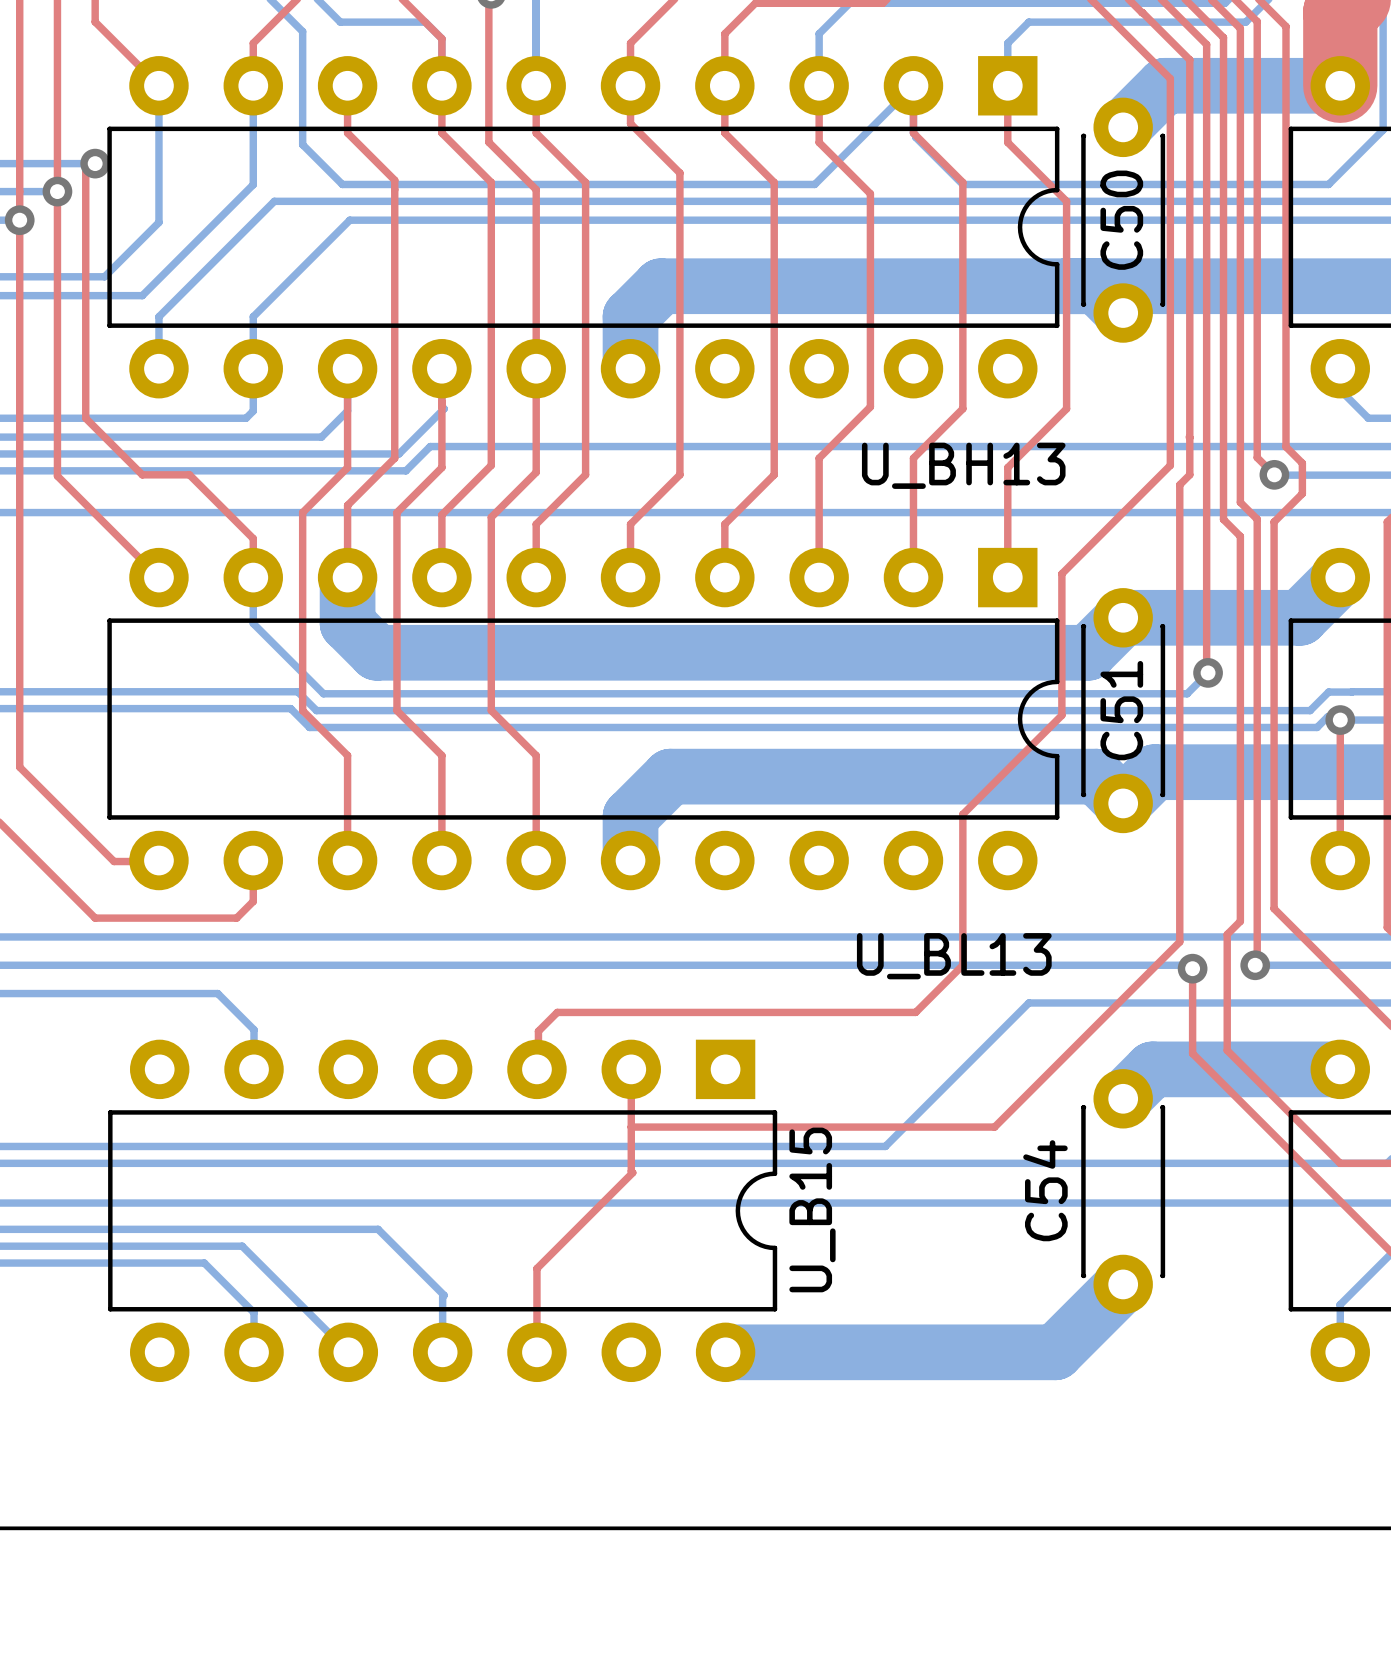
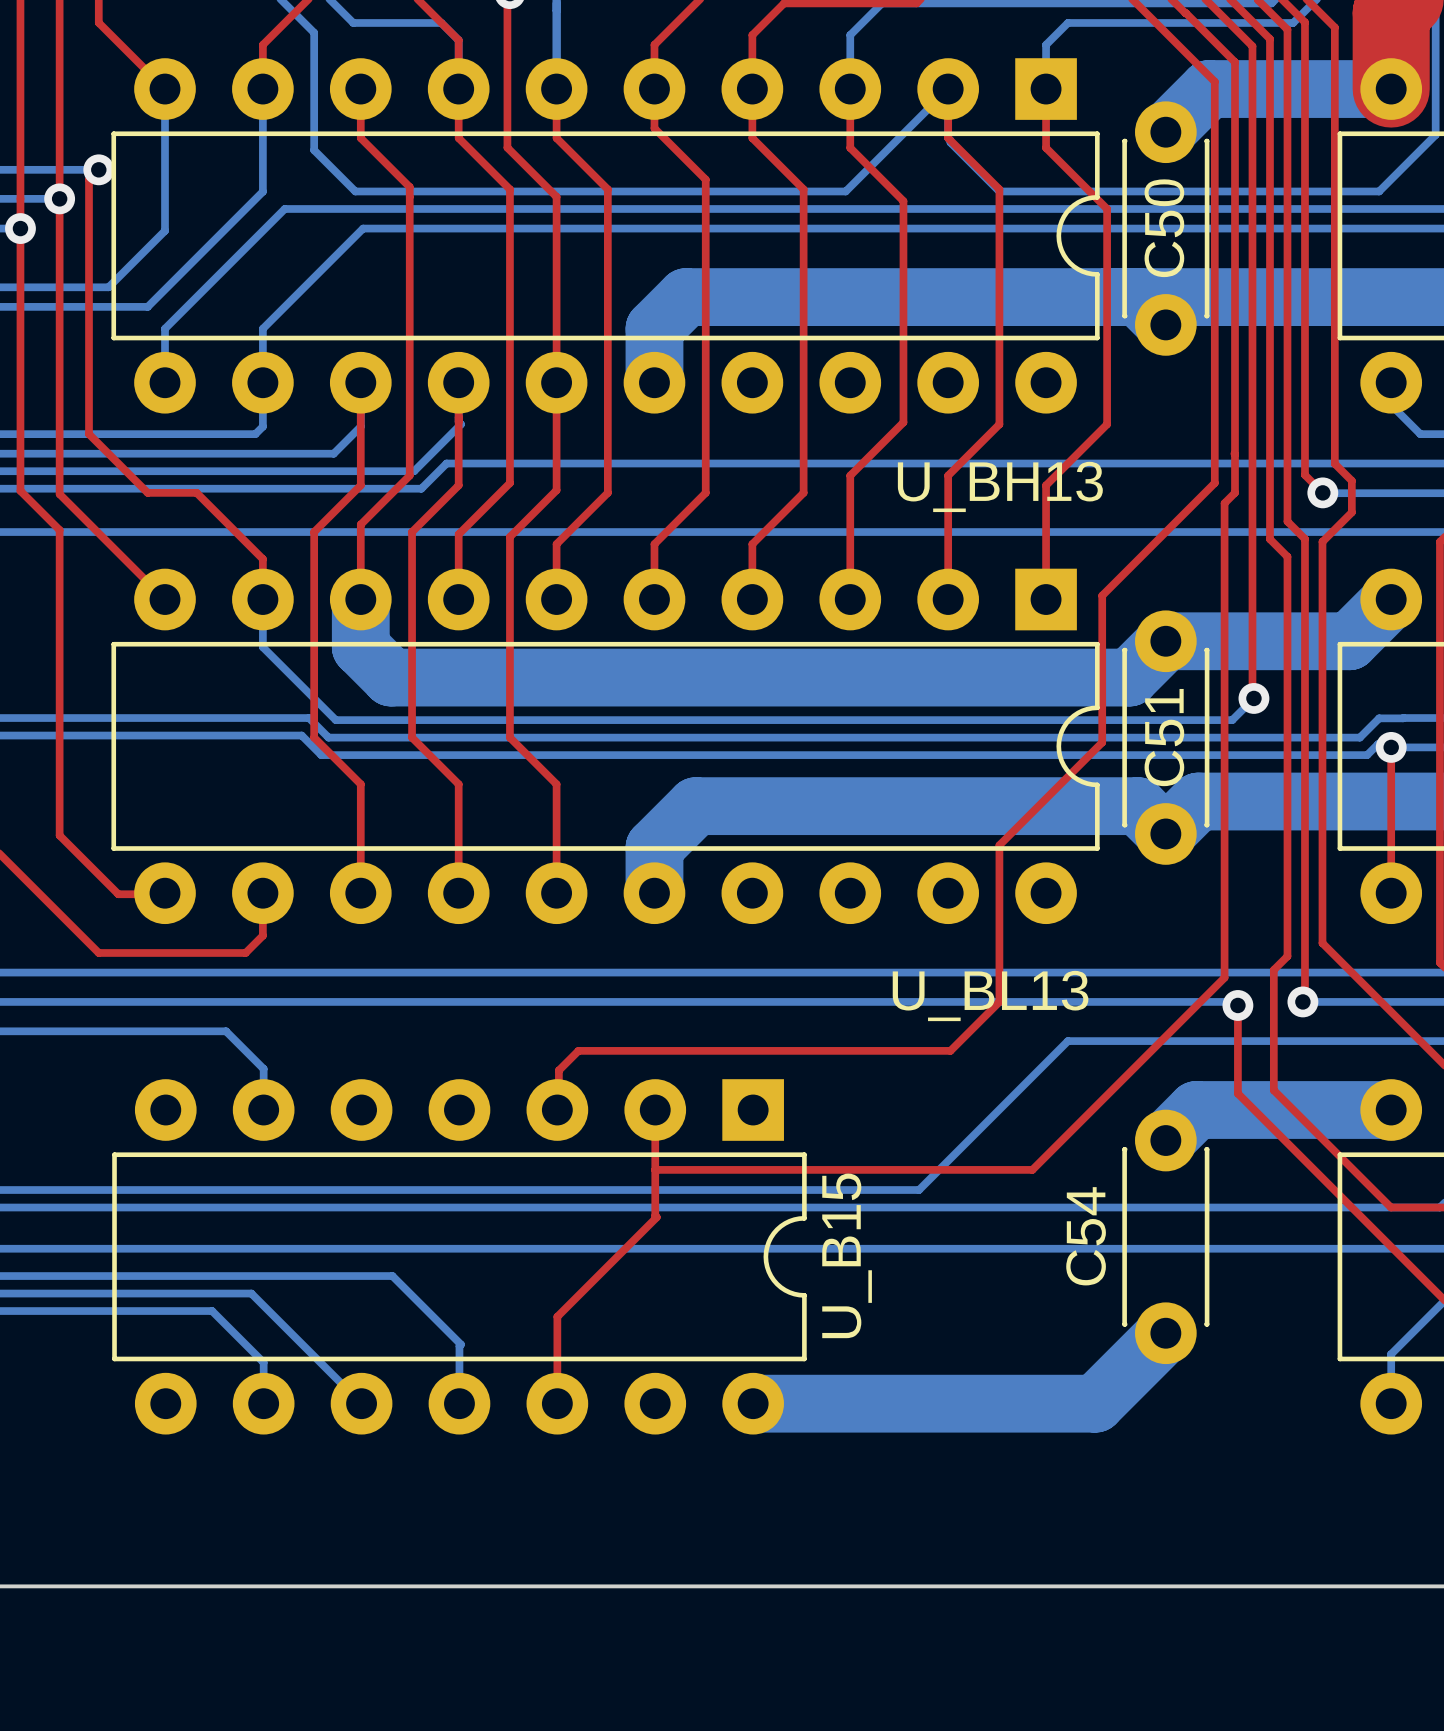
top track: (19, 472) (19, 767) (57, 804) -> (20, 490) (59, 530) (59, 835)

